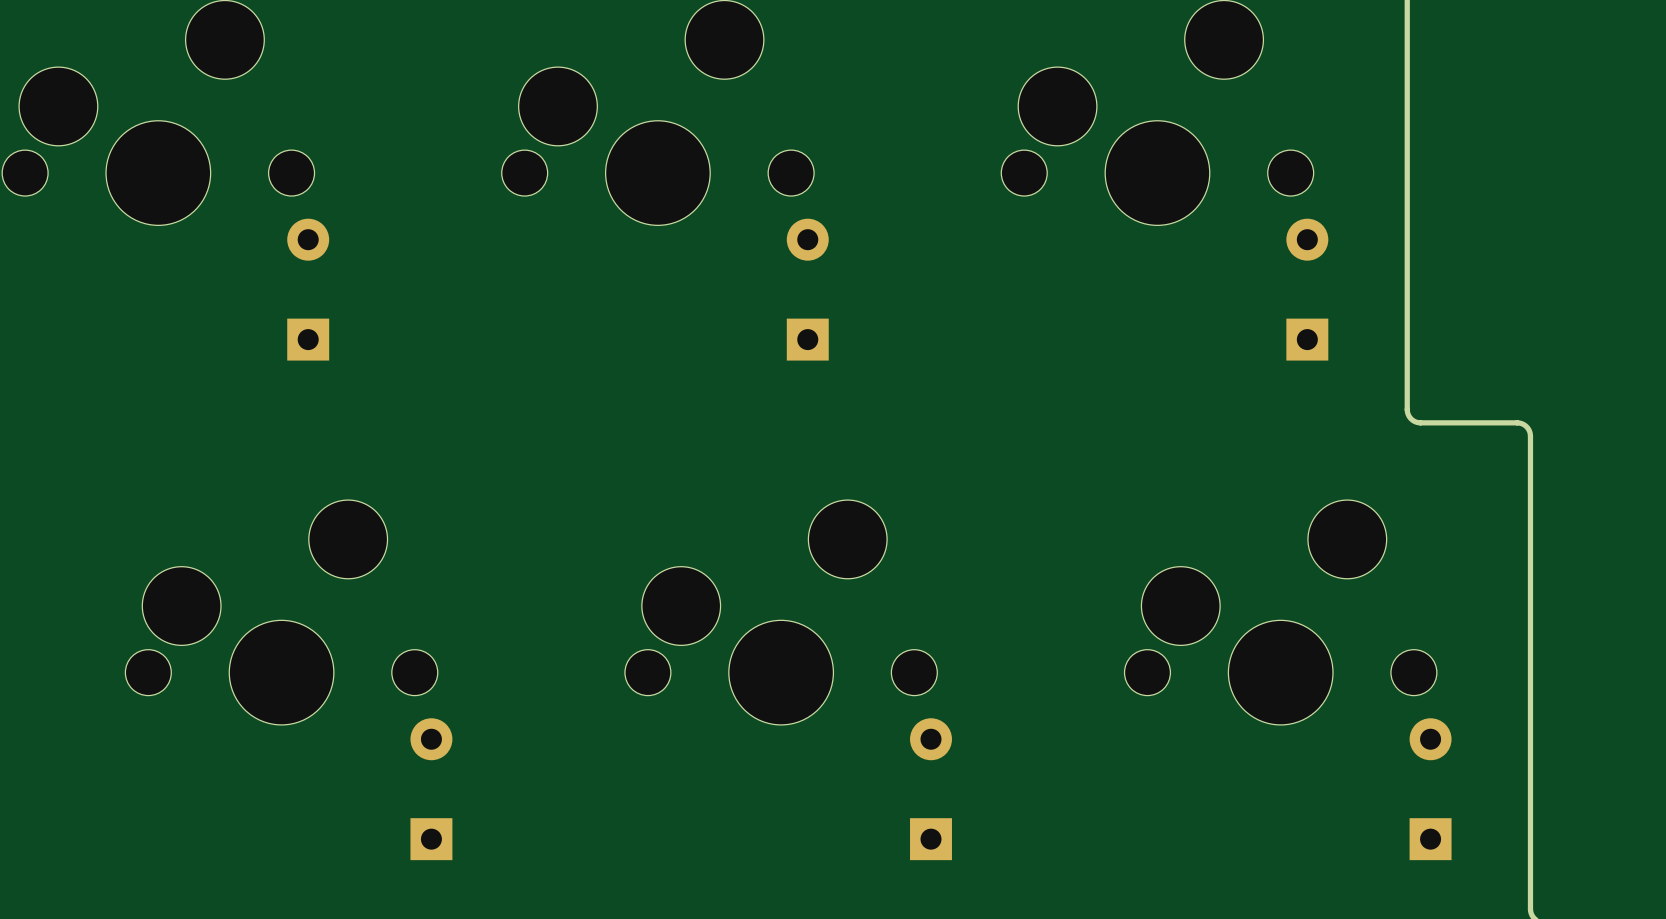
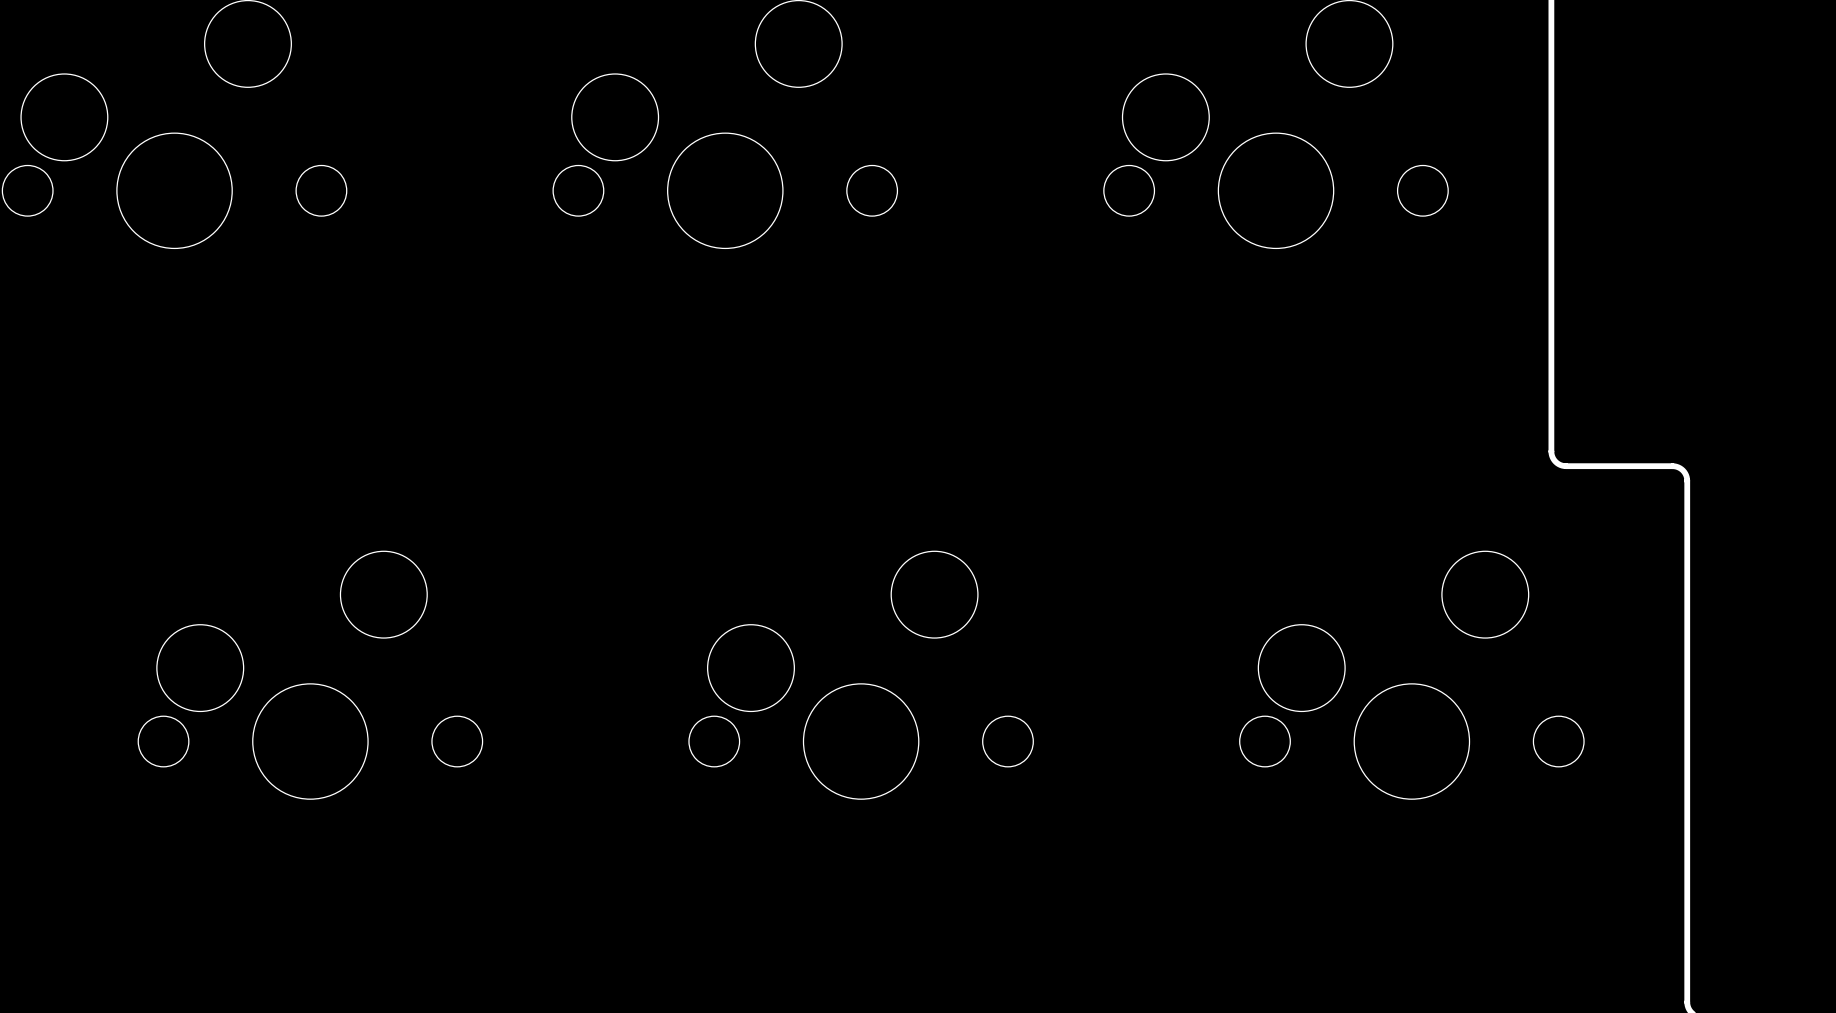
part: (308, 289) -> none
part: (807, 289) -> none
part: (1307, 289) -> none
part: (431, 789) -> none
part: (931, 789) -> none
part: (1430, 789) -> none

